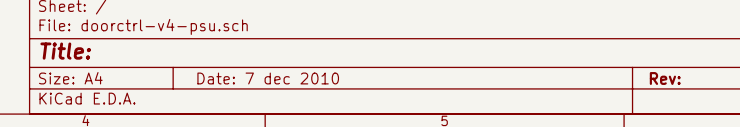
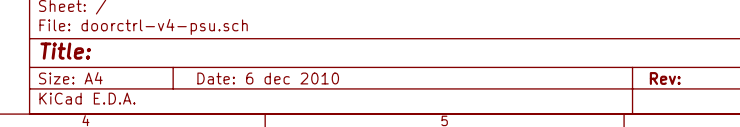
title block: Date: 7 dec 2010 (268, 78) -> Date: 6 dec 2010 (268, 78)

